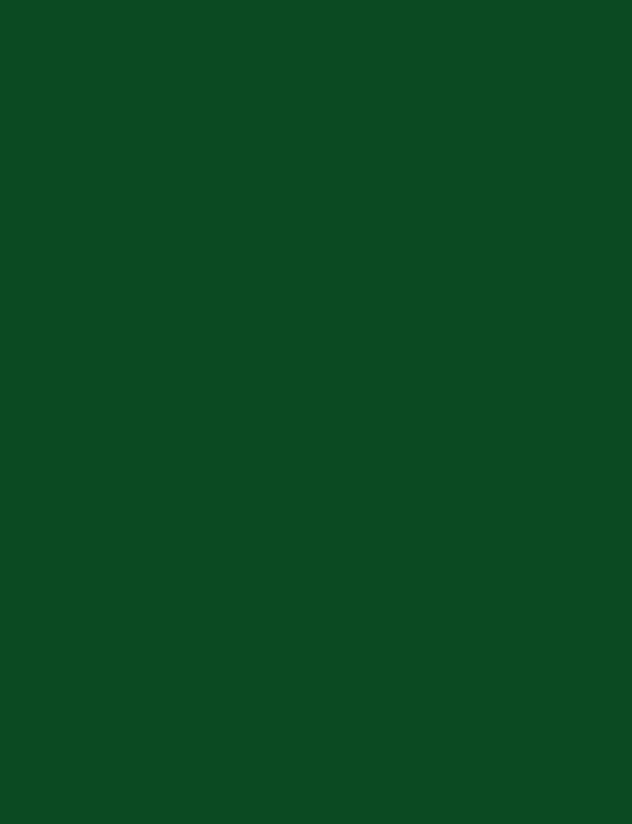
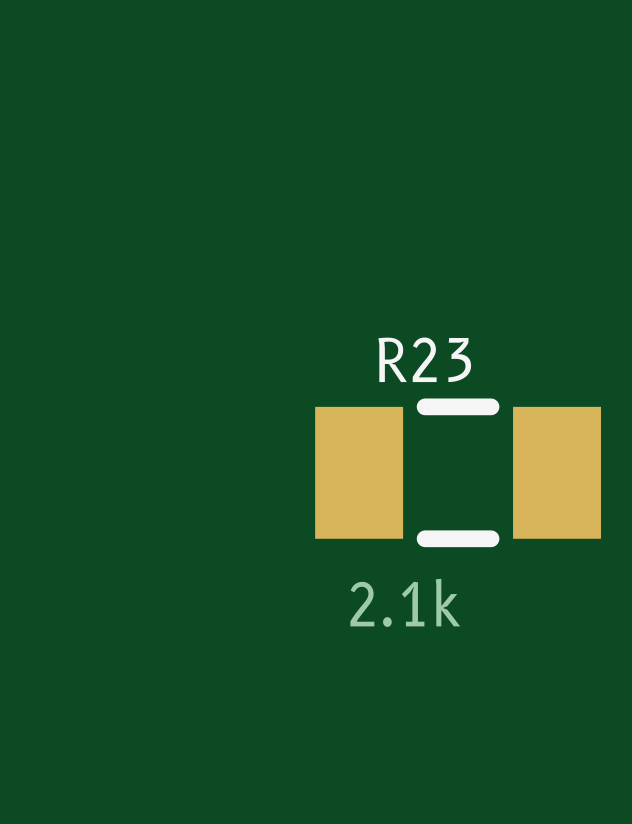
R23: none -> 2.1k (458, 472)

